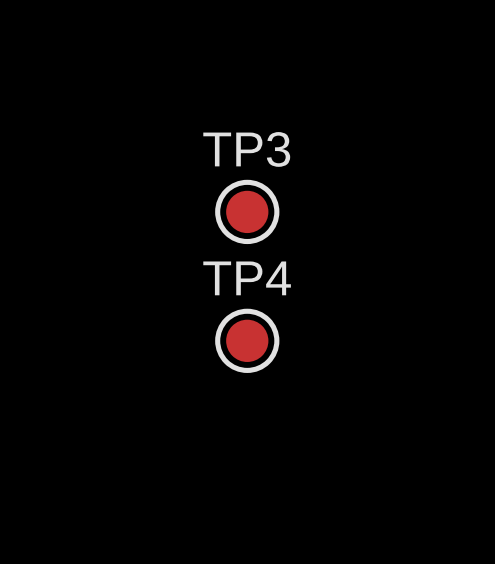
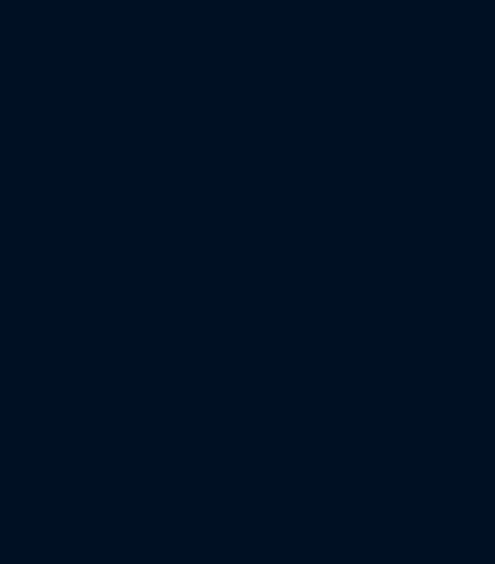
TP3: (247, 211) -> none
TP4: (247, 340) -> none

